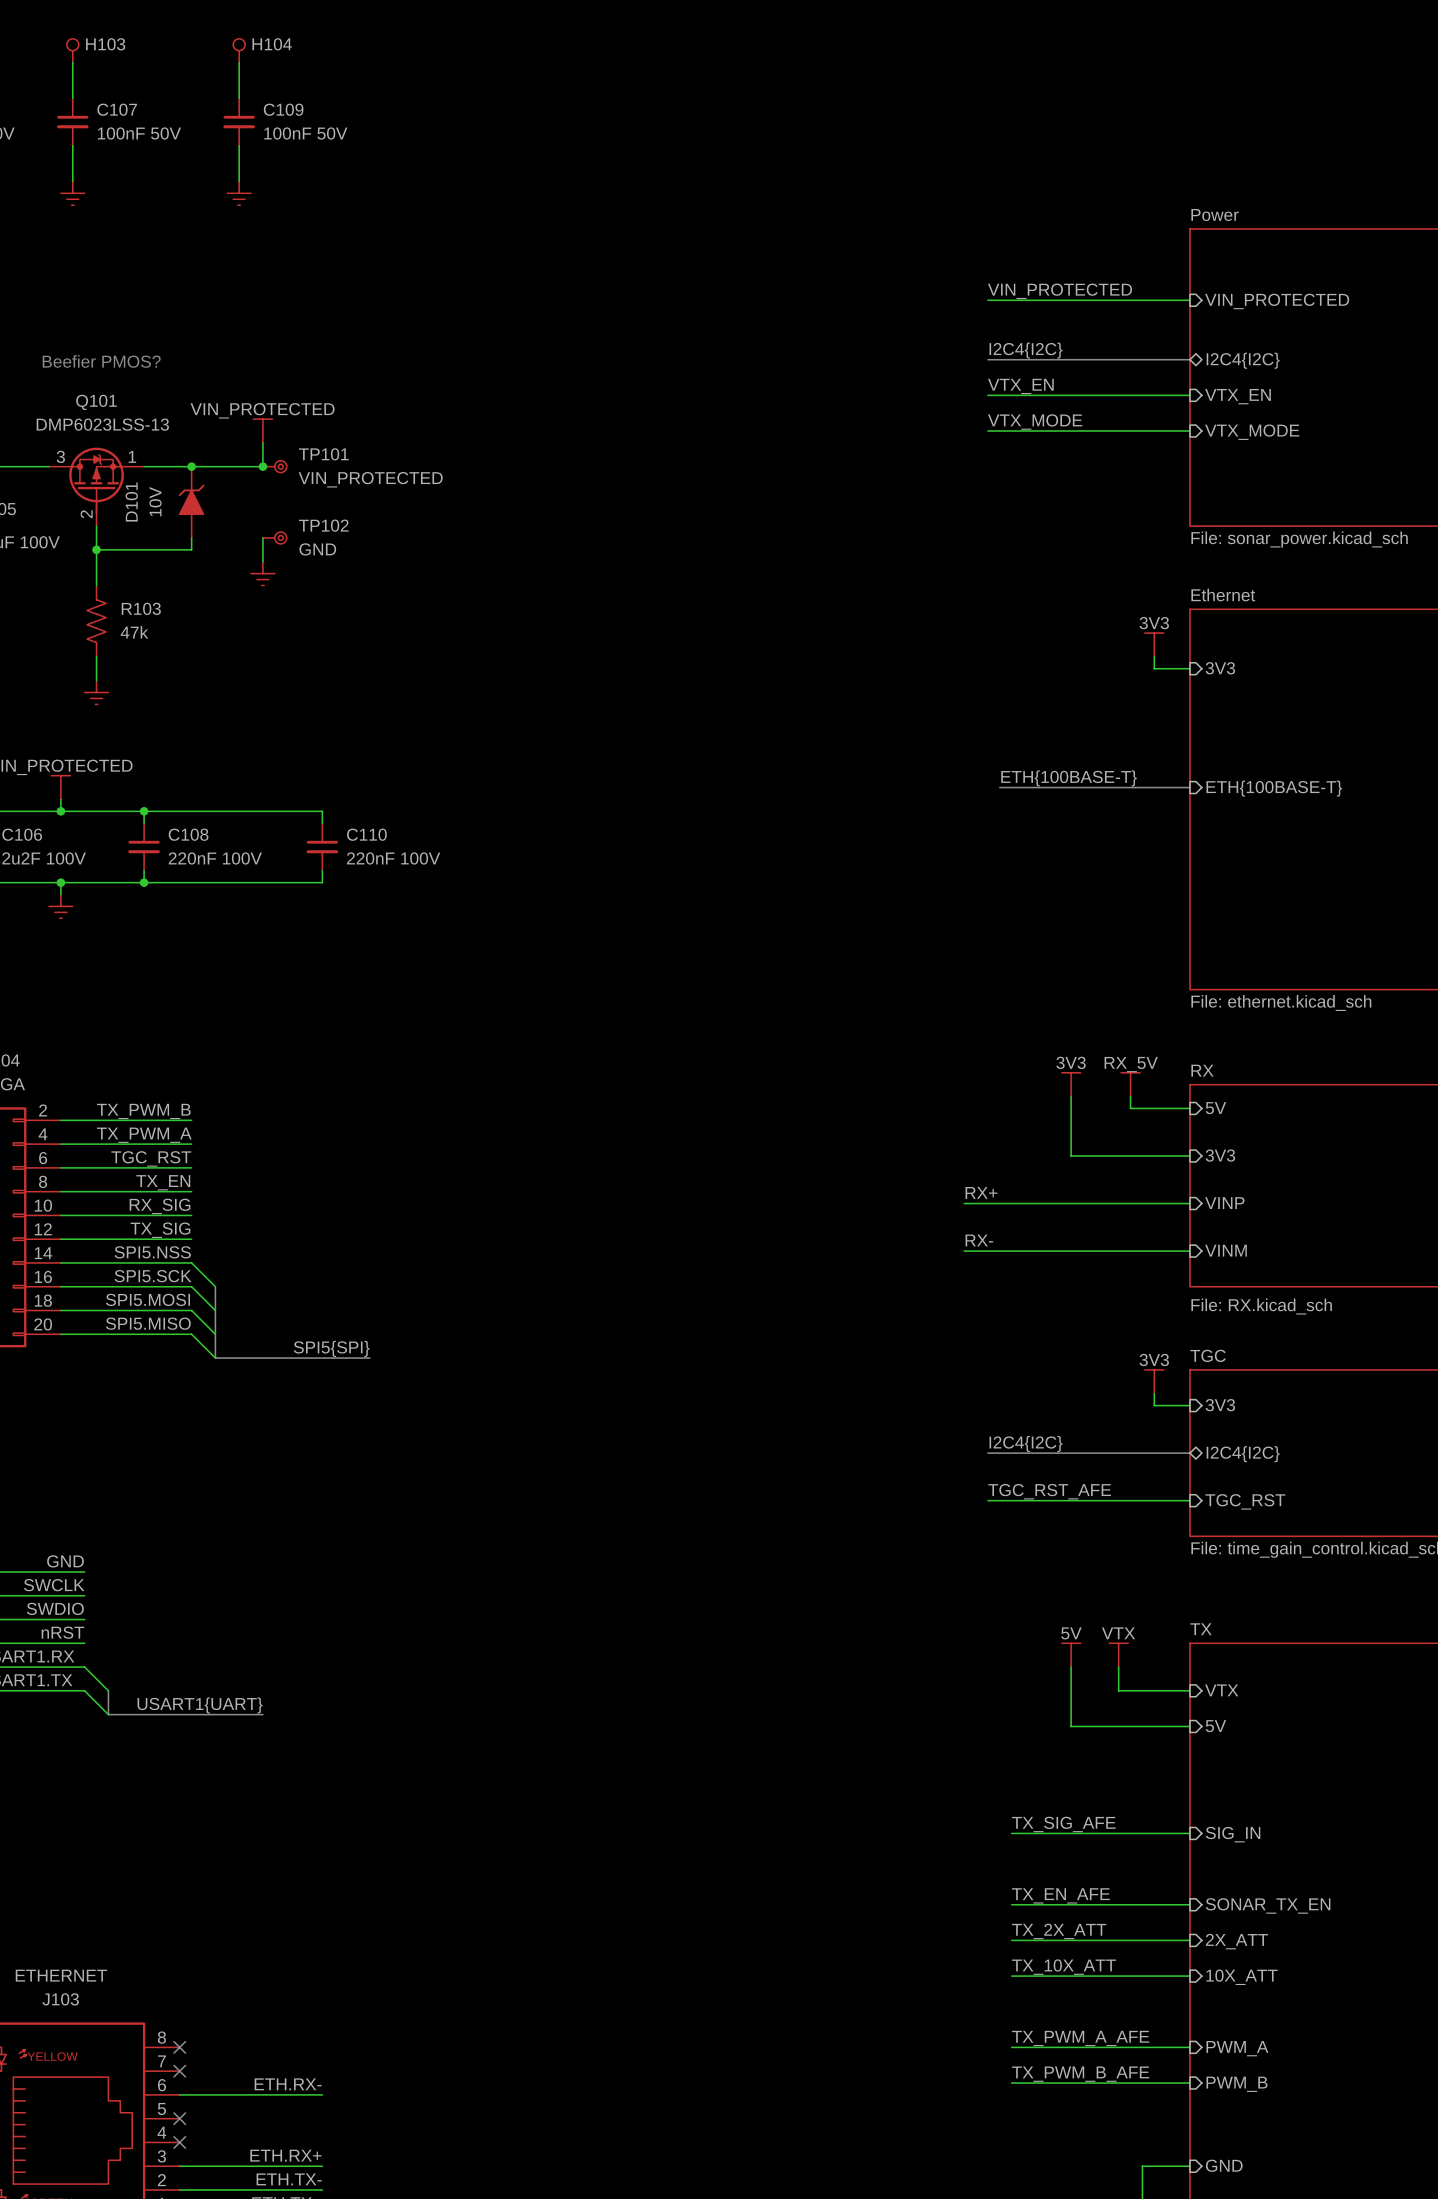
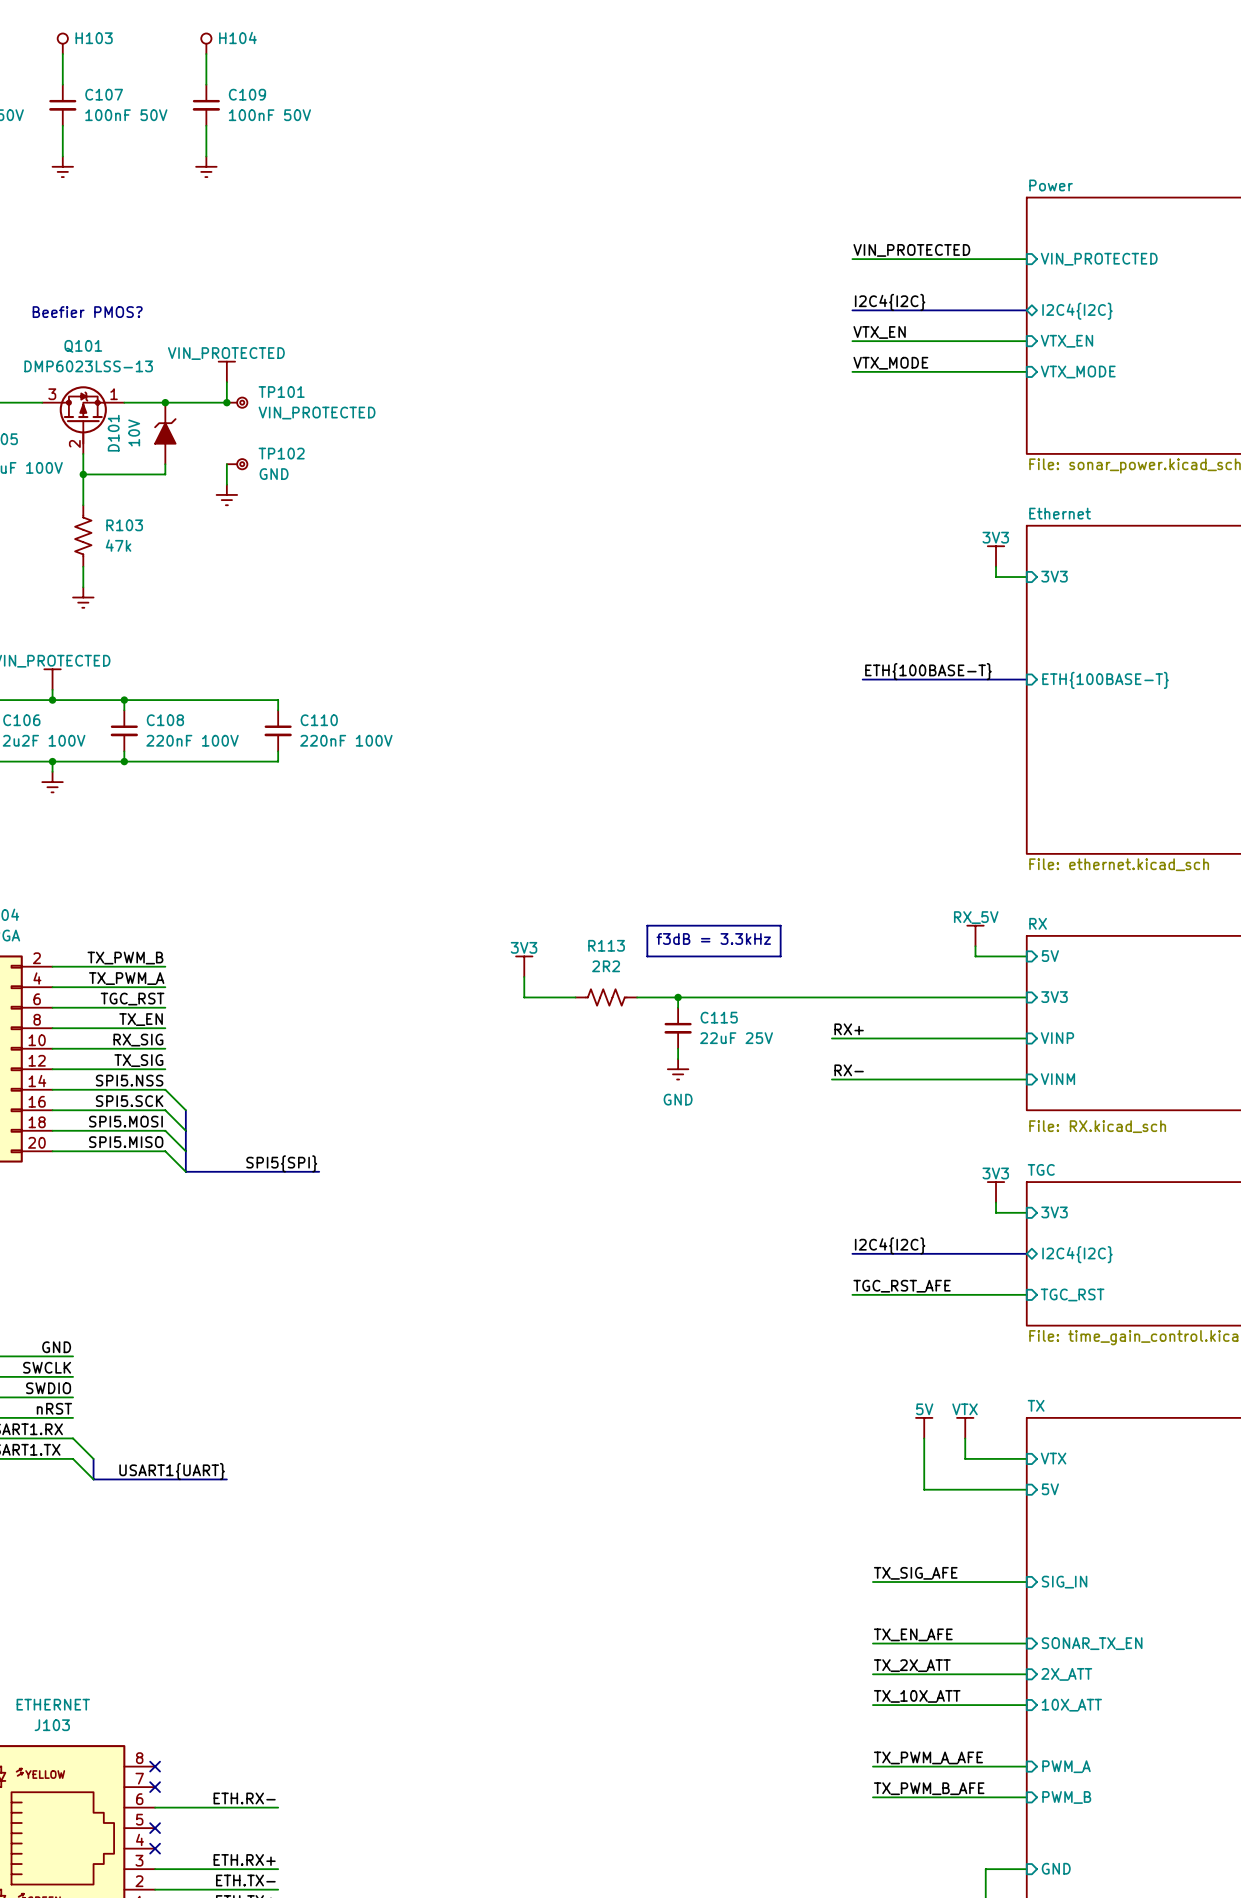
line: none -> (647, 925) (780, 925) (780, 956) (647, 956) (647, 925)
power symbol: 3V3 (1071, 1084) -> none
text: none -> f3dB = 3.3kHz (713, 938)
wire: (1071, 1096) (1071, 1156) -> (637, 997) (924, 997)
power symbol: none -> 3V3 (524, 966)
wire: none -> (524, 976) (524, 997) (575, 997)
R113: none -> 2R2 (606, 997)
wire: none -> (678, 997) (678, 1007)
junction: none -> (678, 997)
C115: none -> 22uF 25V (678, 1028)
wire: none -> (678, 1048) (678, 1058)
power symbol: none -> GND (678, 1069)

